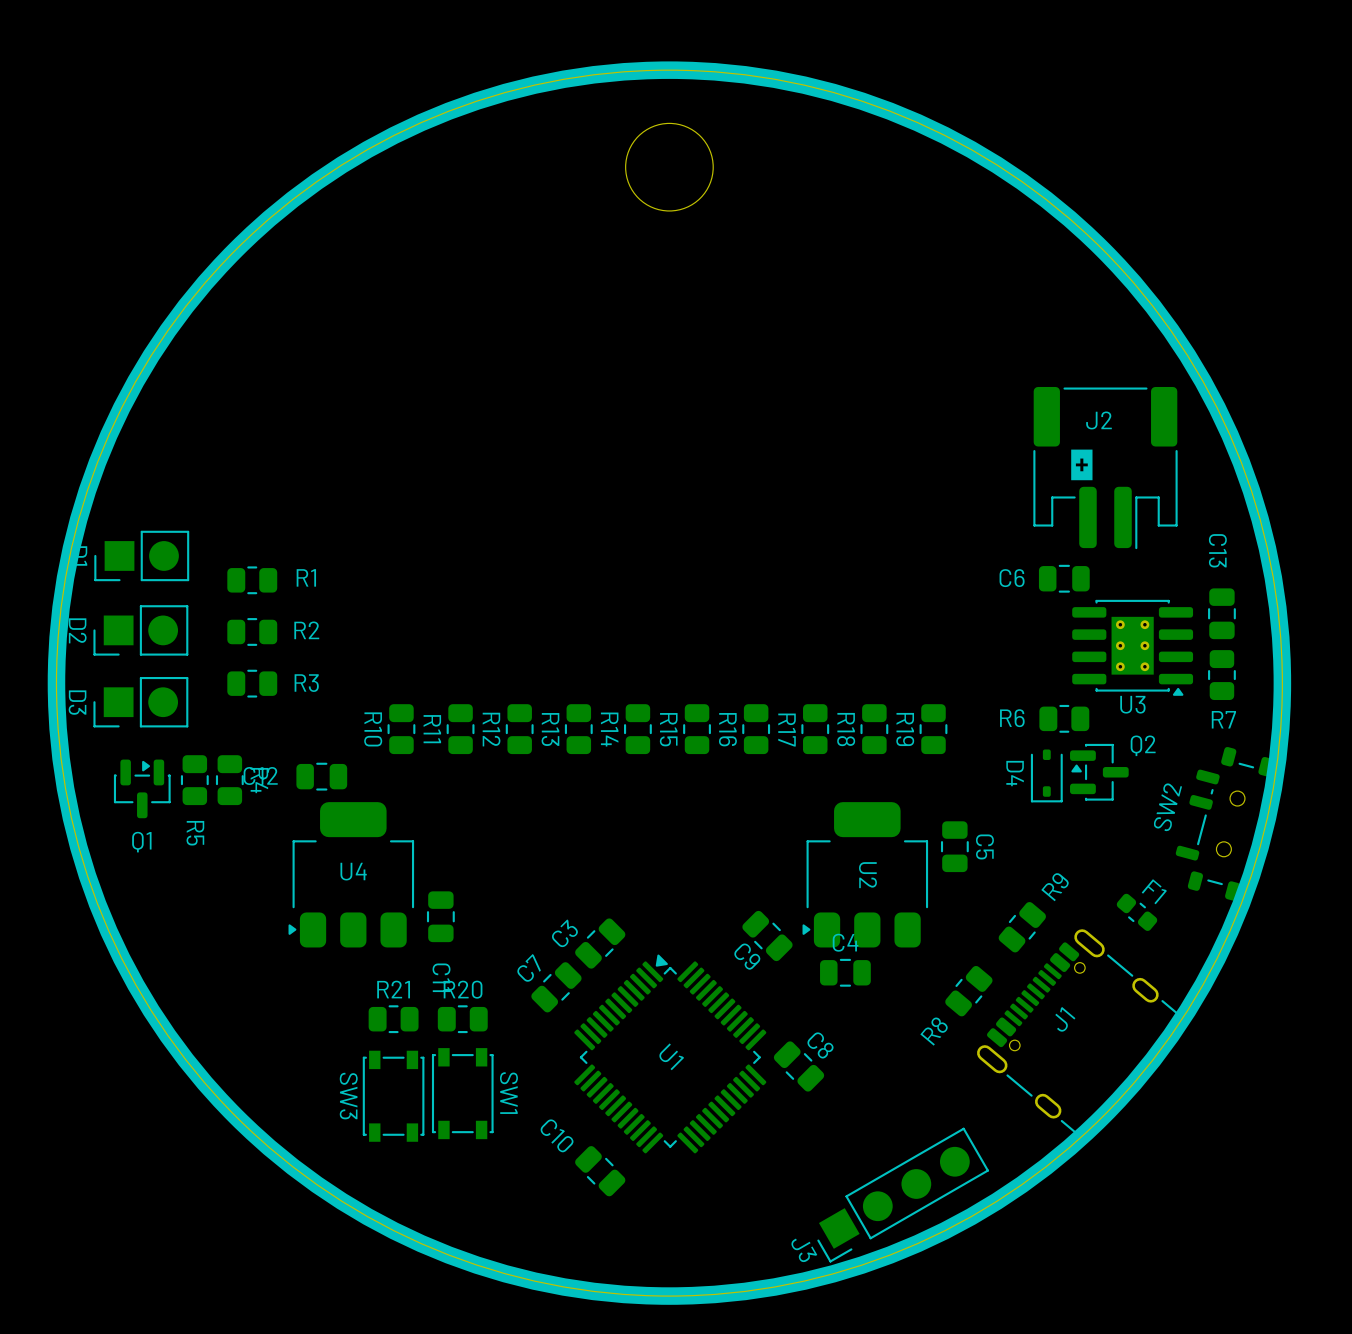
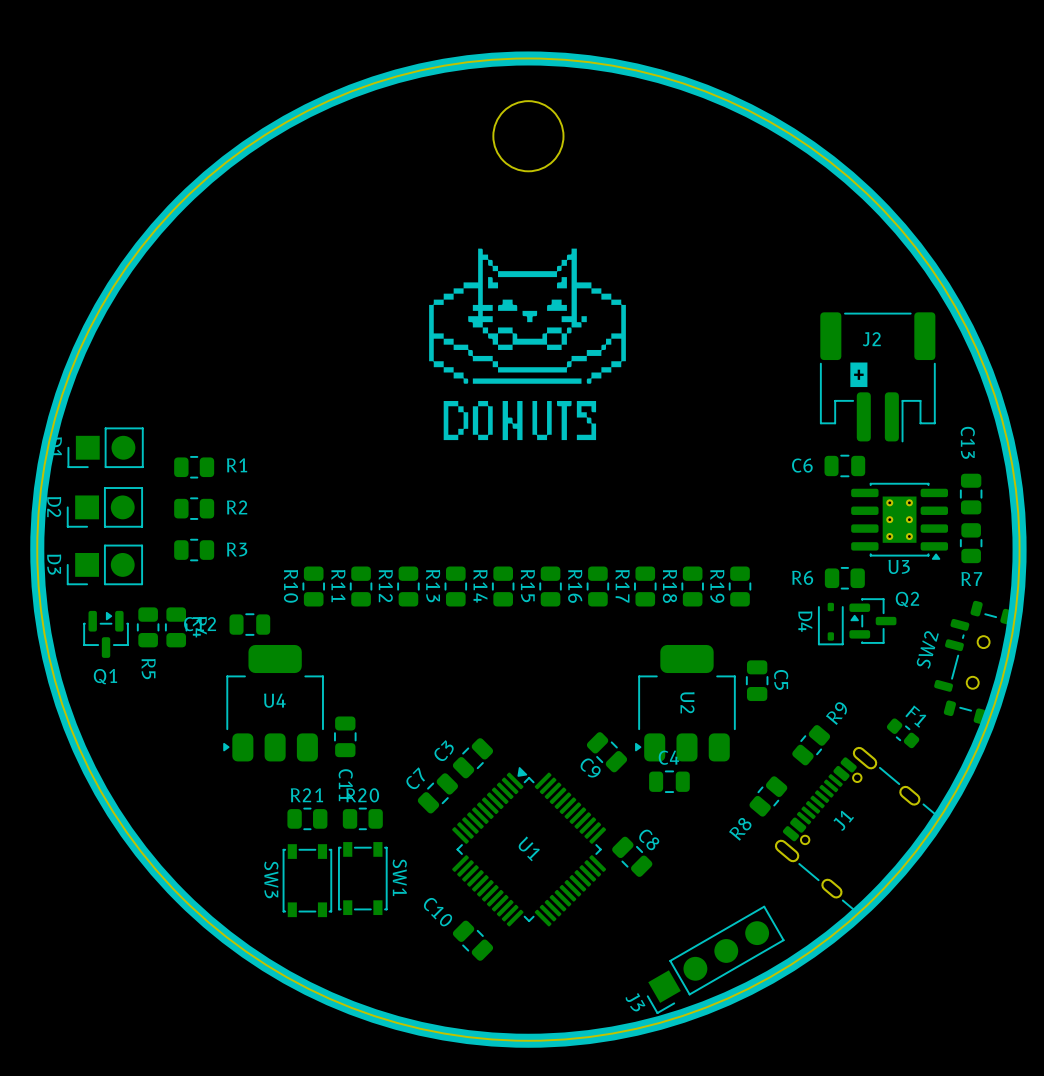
drawing: none -> [429, 248, 626, 441]

